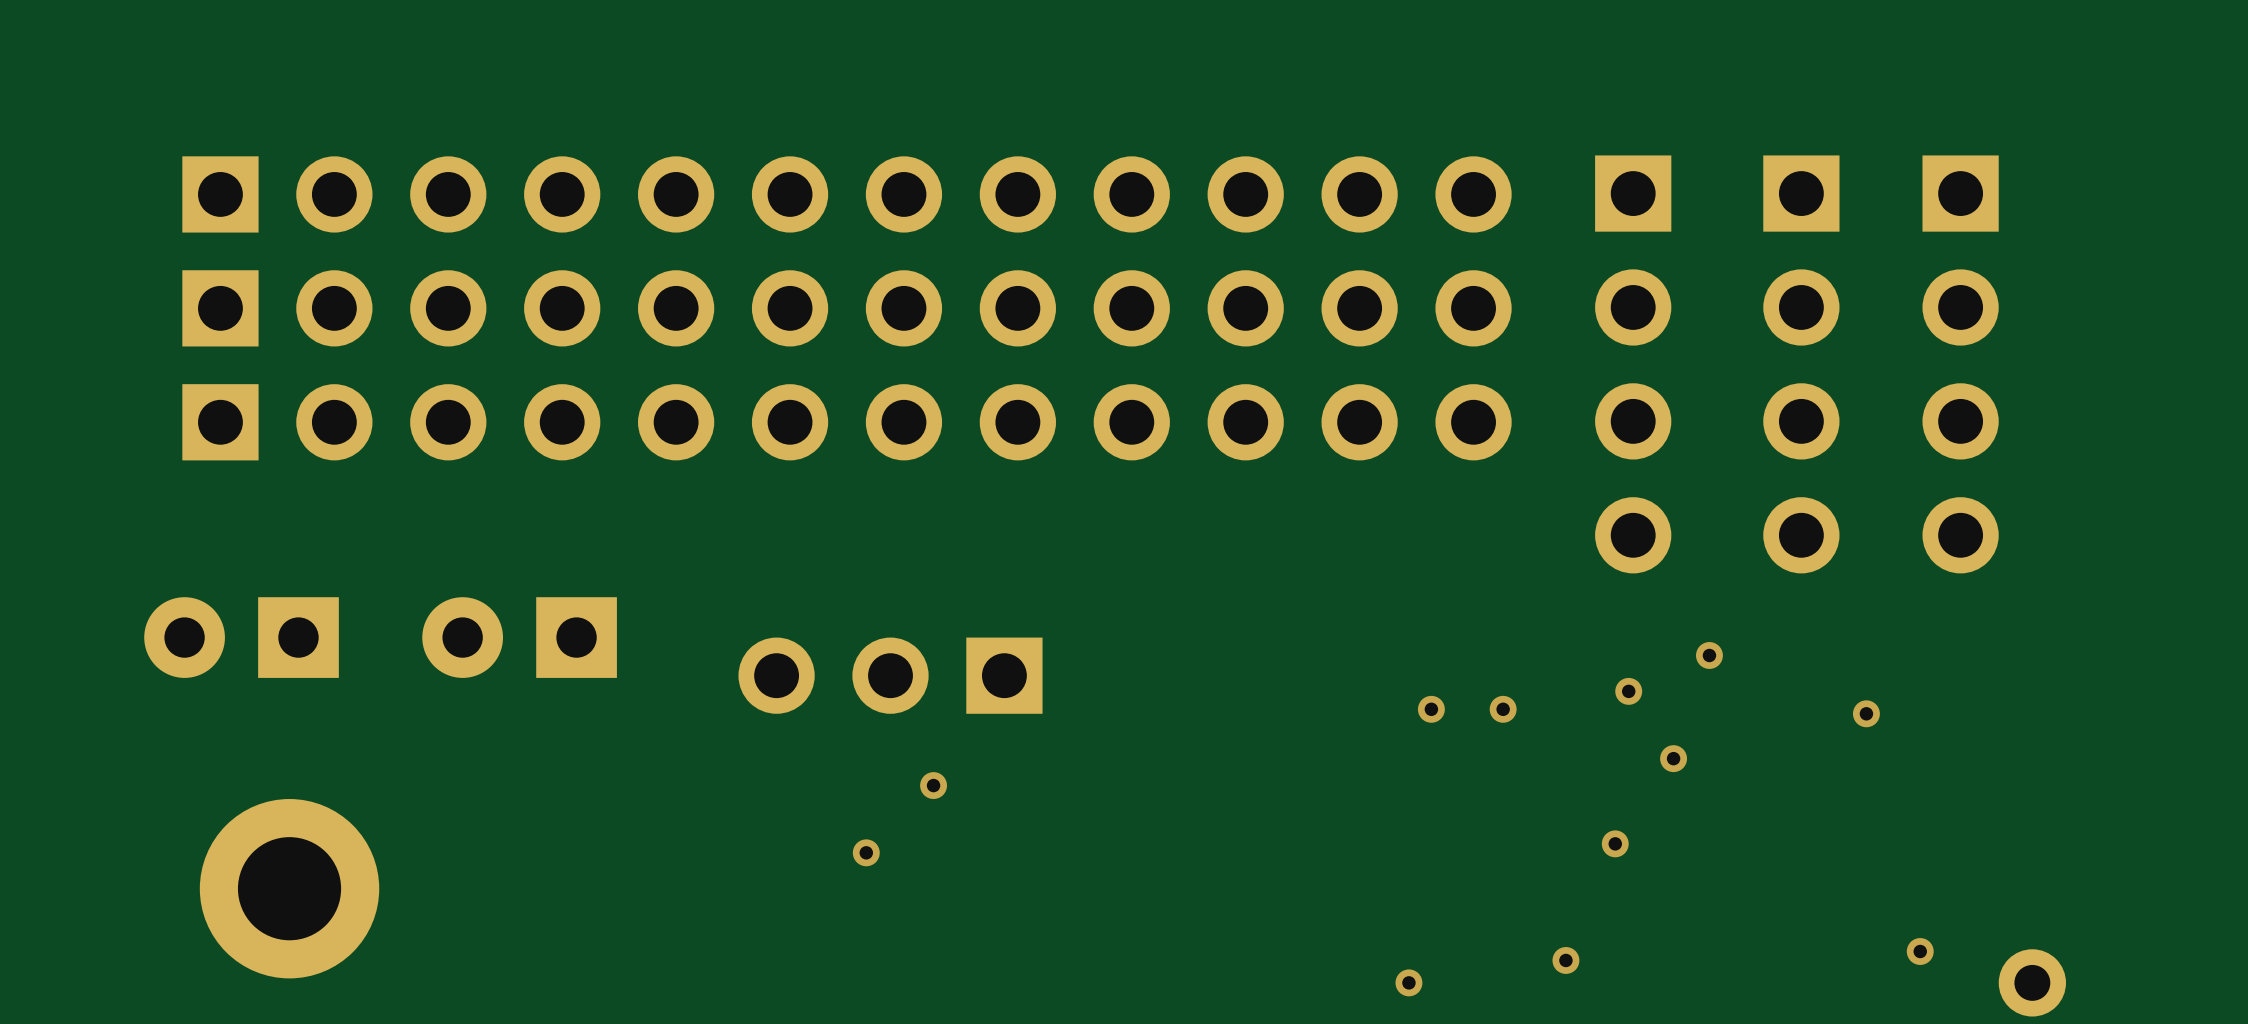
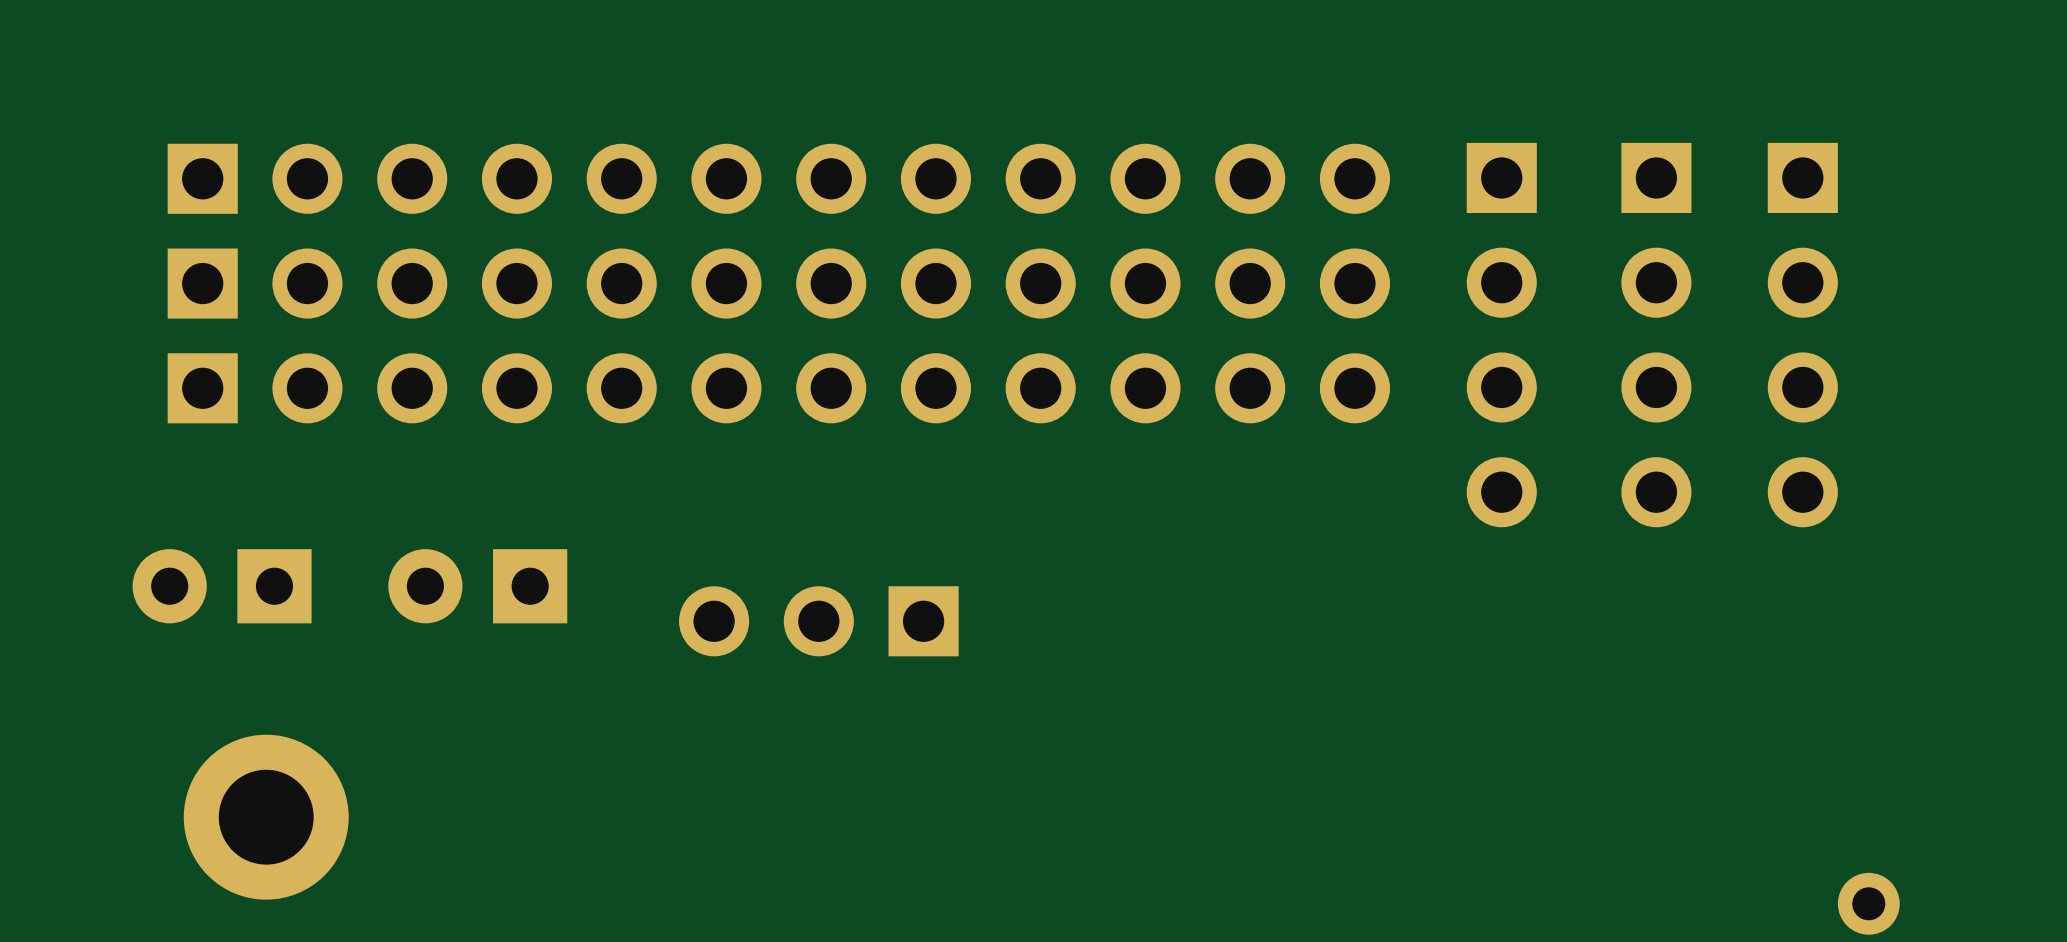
via: (1709, 655) -> none
via: (1628, 691) -> none
via: (1431, 709) -> none
via: (1503, 709) -> none
via: (1866, 713) -> none
via: (1673, 758) -> none
via: (933, 785) -> none
via: (1615, 843) -> none
via: (866, 852) -> none
via: (1920, 951) -> none
via: (1565, 960) -> none
via: (1408, 982) -> none

